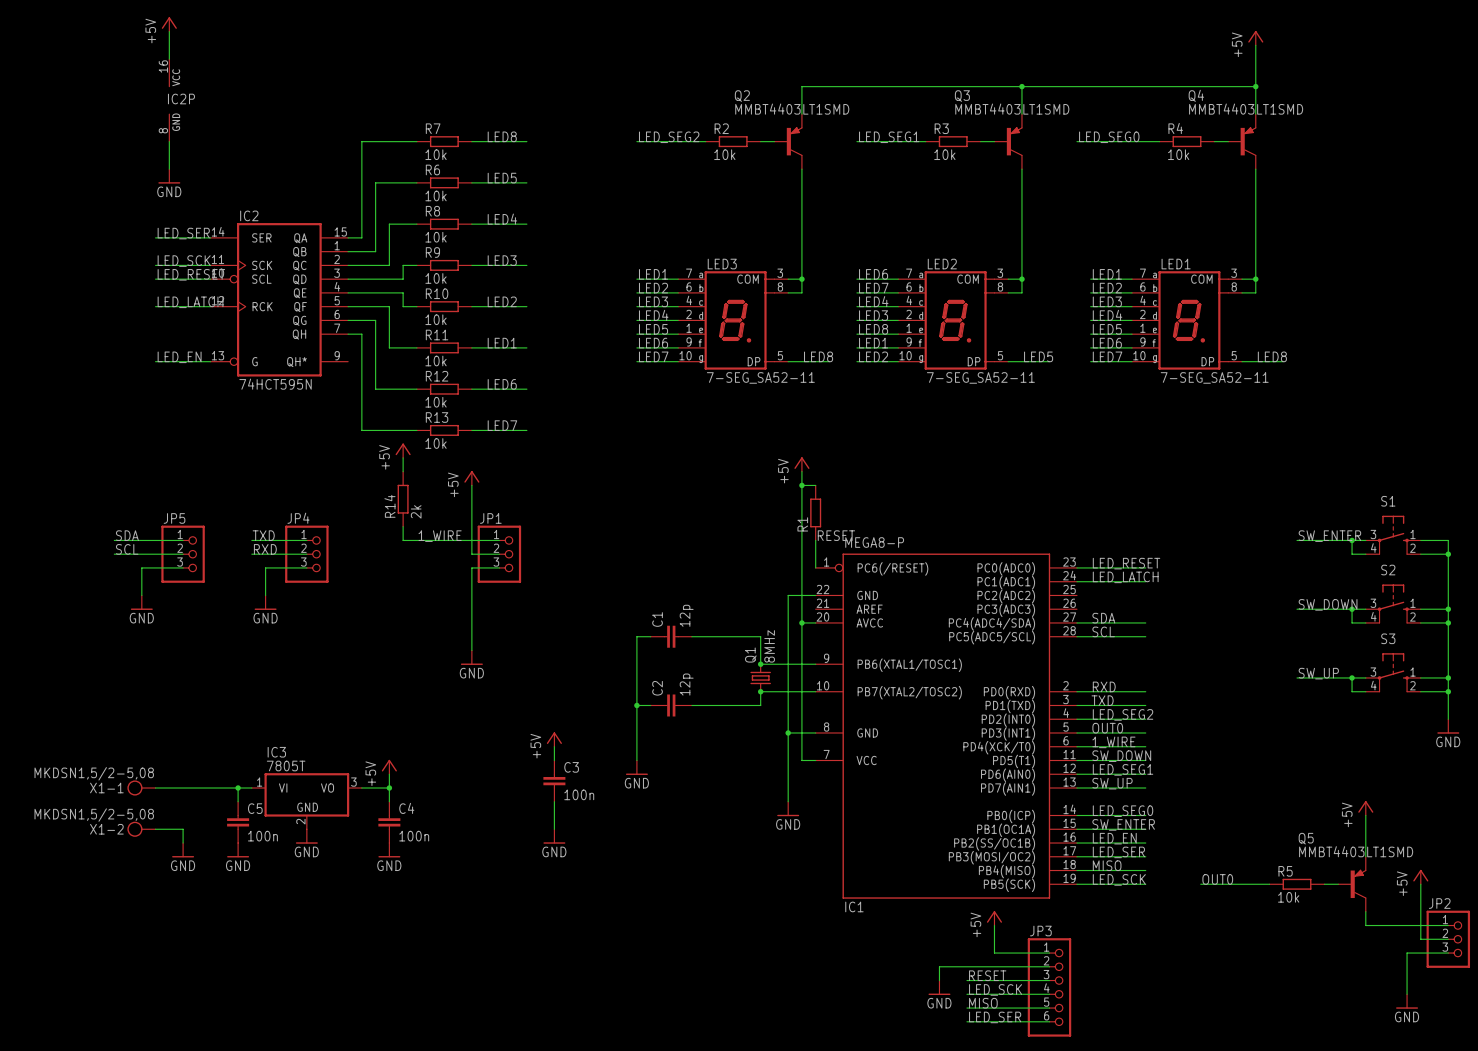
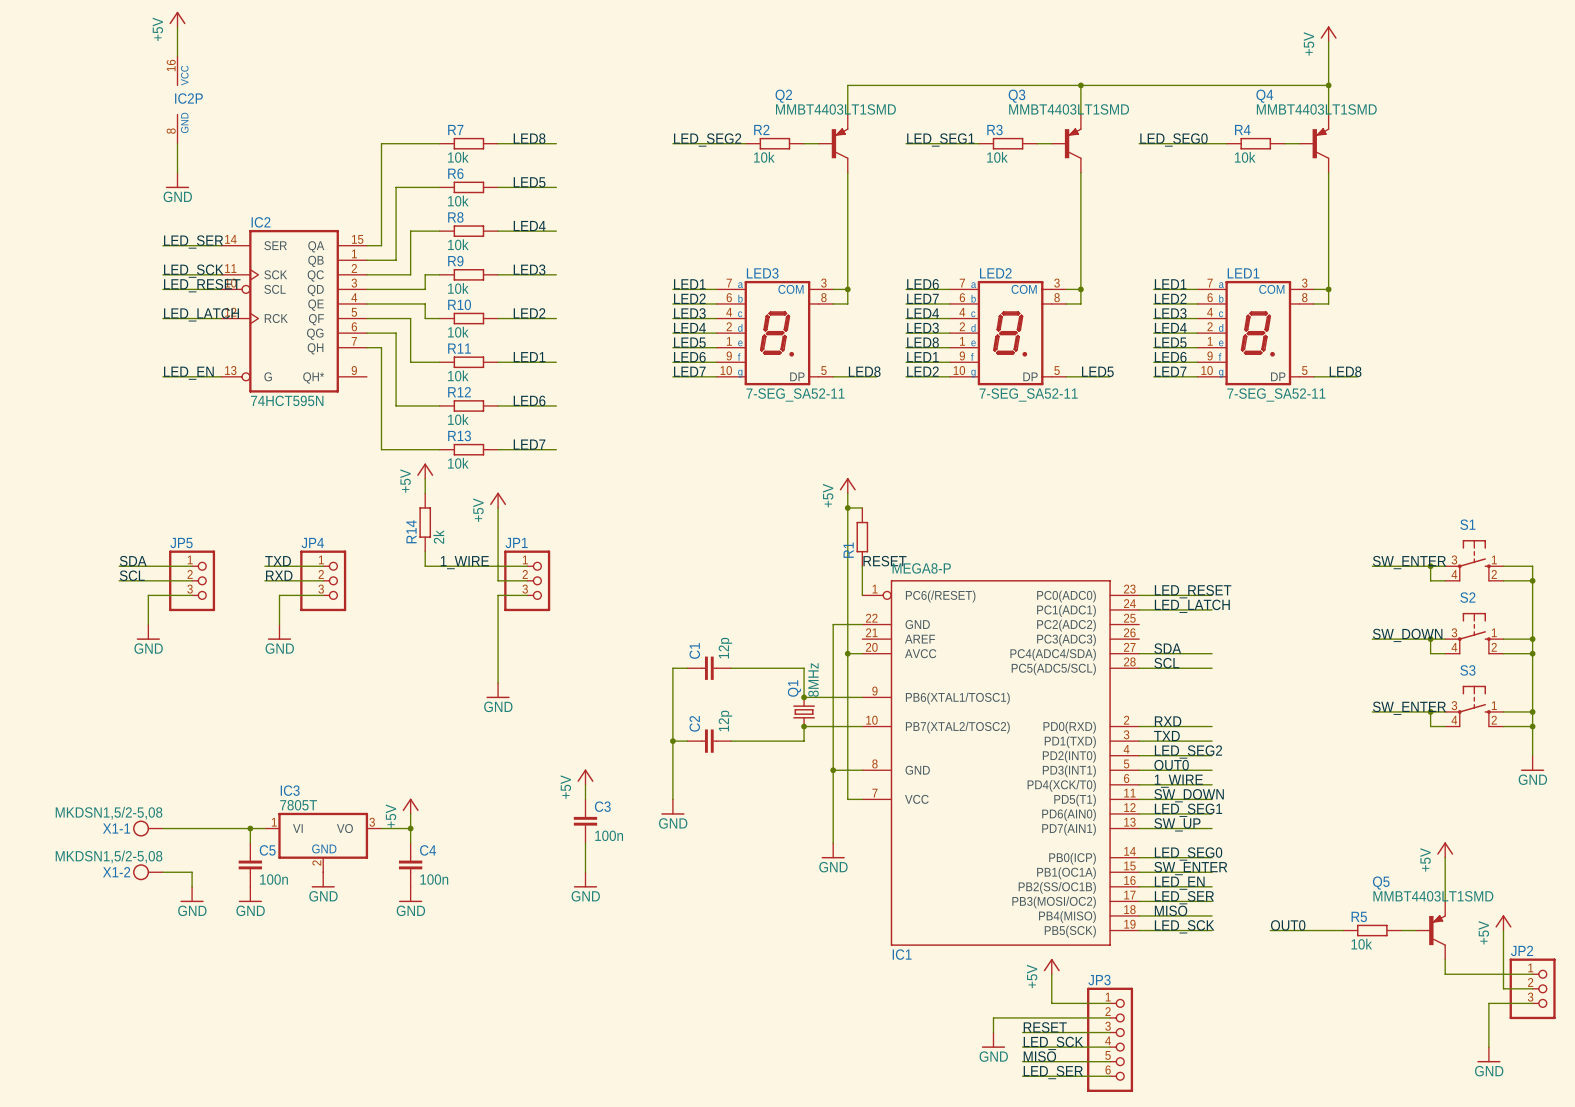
label: SW_UP (1318, 673) -> SW_ENTER (1409, 708)

